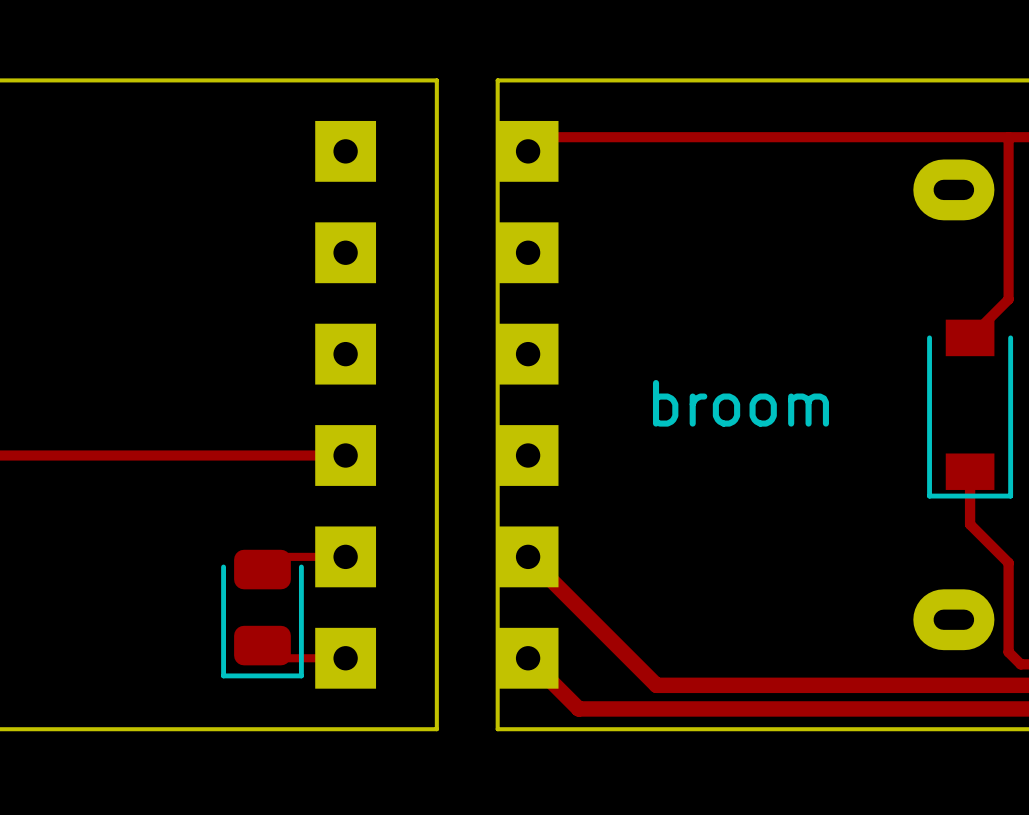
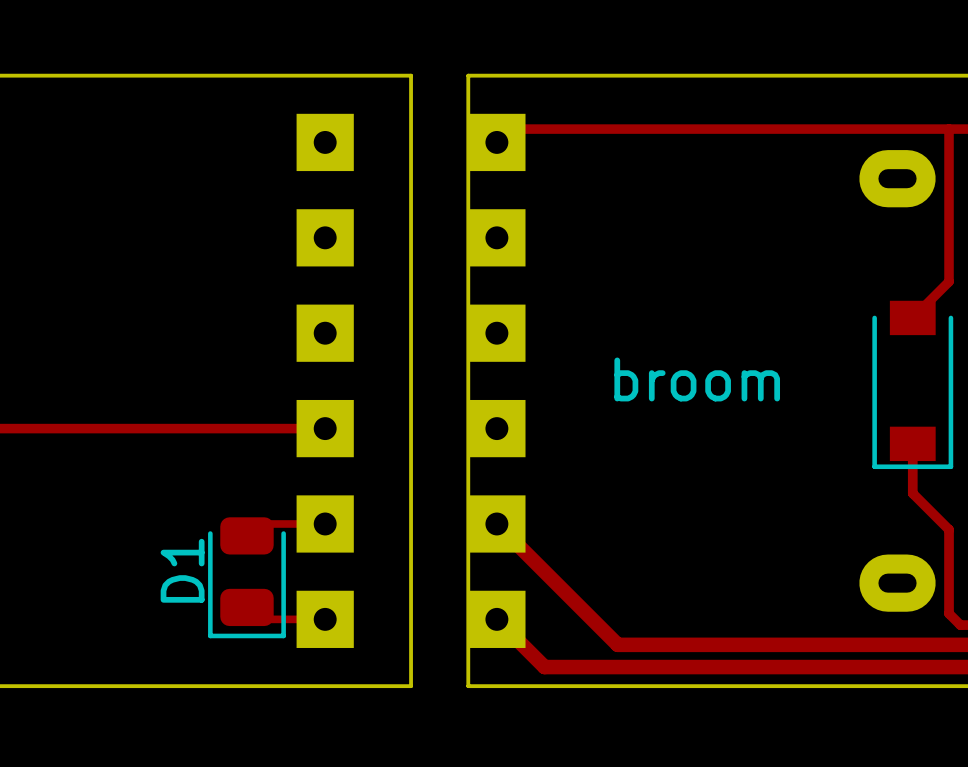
D1 name: none -> D1 (182, 570)

